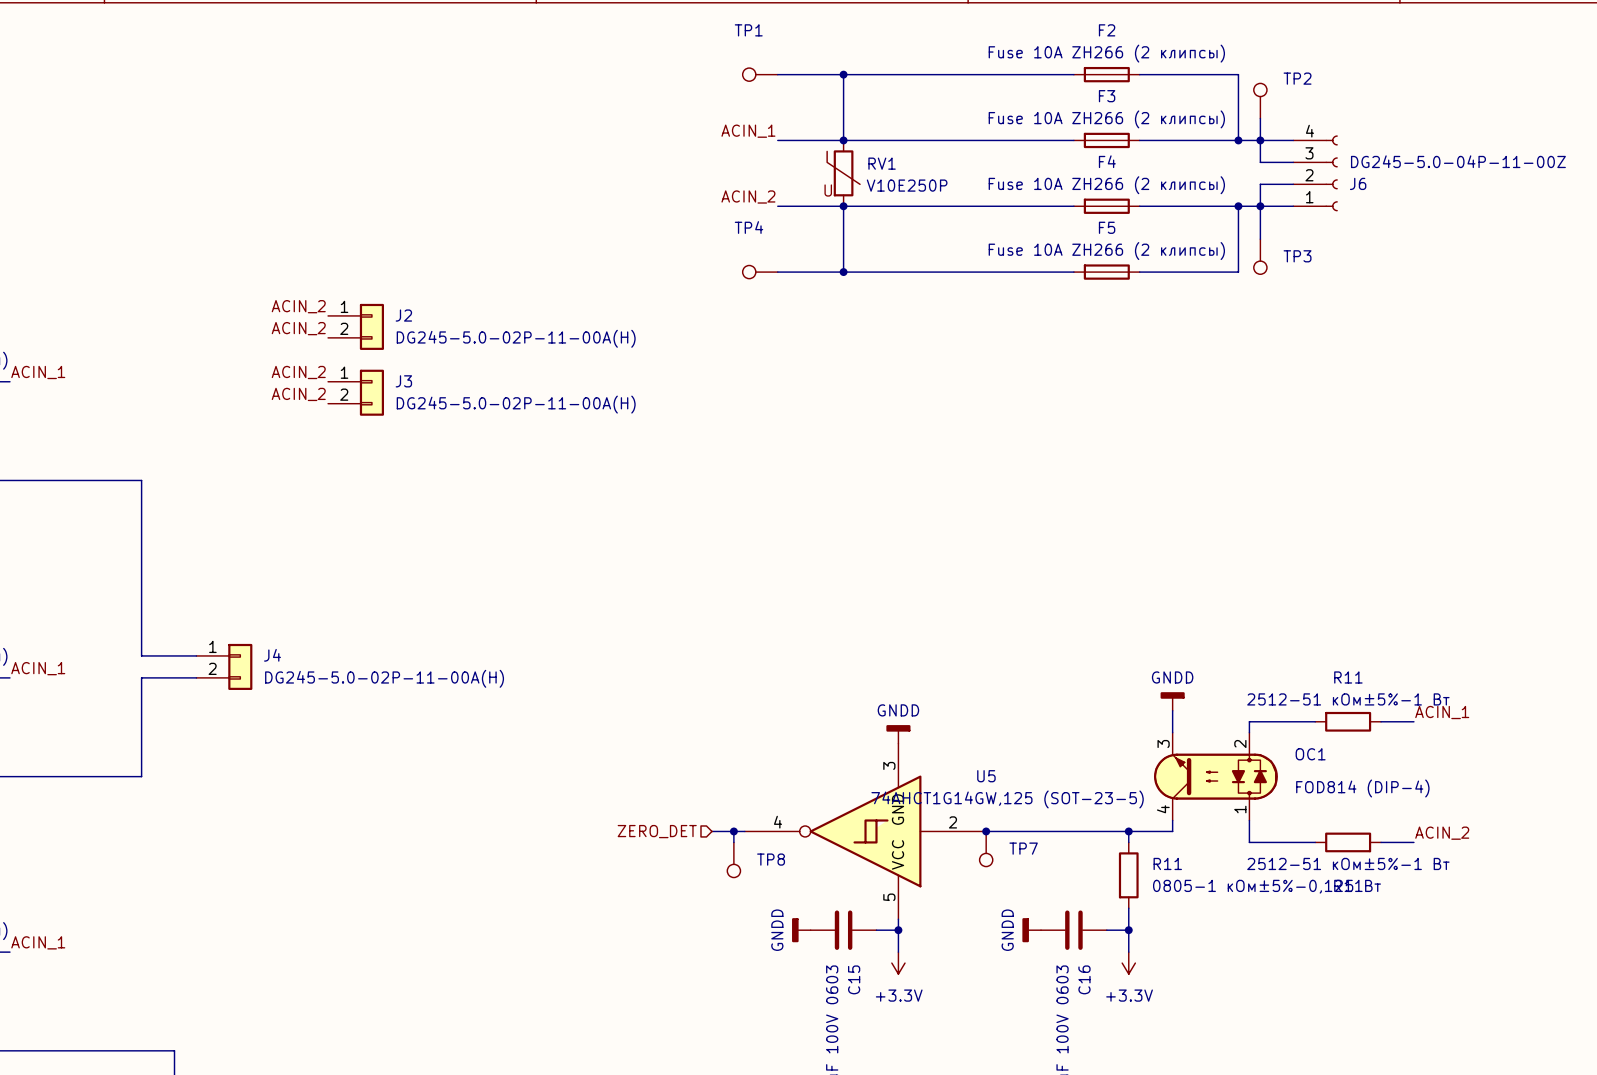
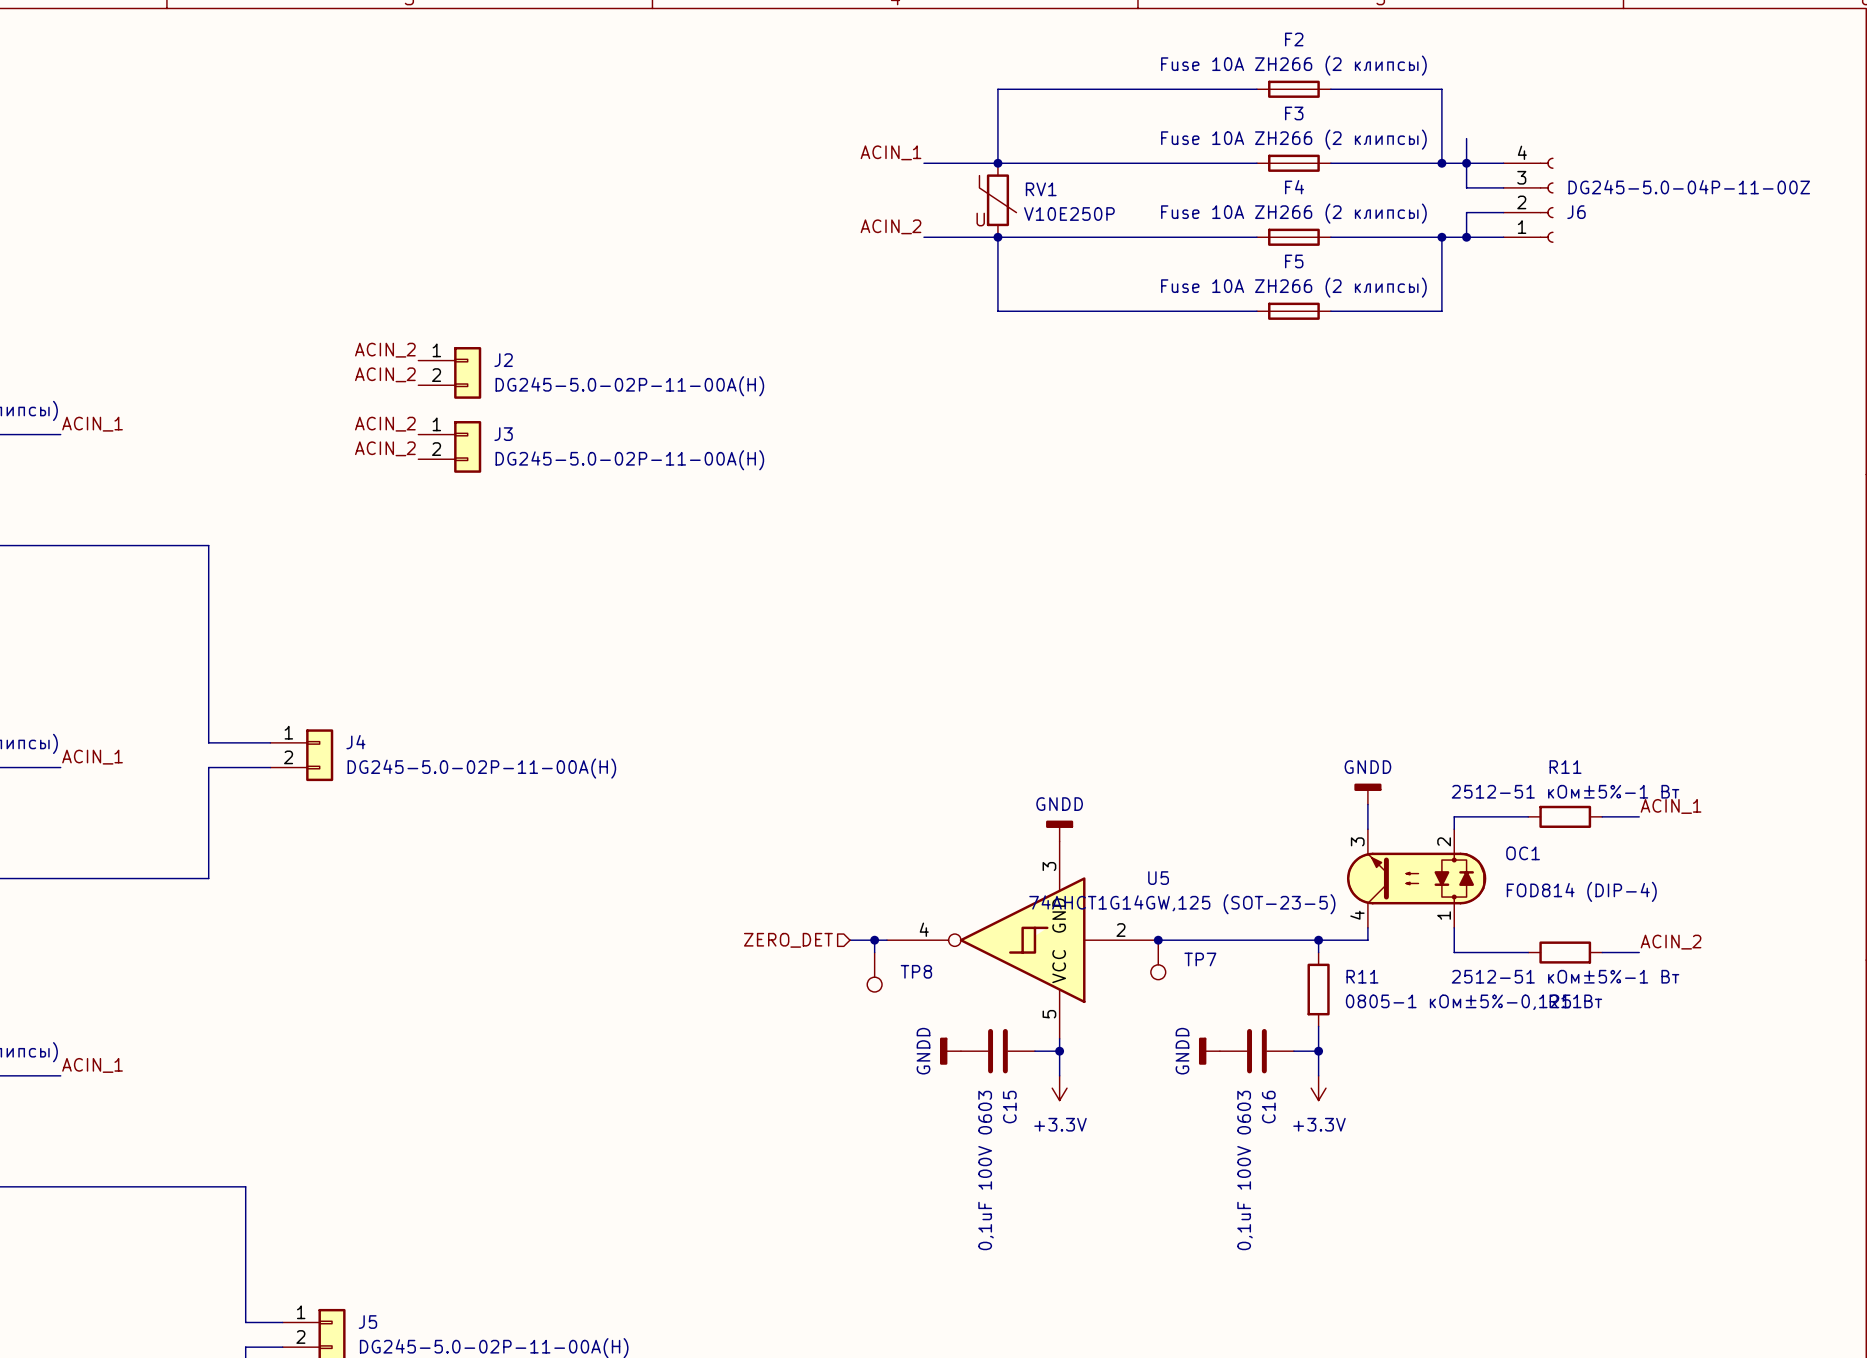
TP1: (760, 74) -> none
wire: (777, 74) (843, 74) -> none
junction: (843, 74) -> none
TP2: (1260, 100) -> none
wire: (1260, 206) (1260, 239) -> none
TP3: (1260, 256) -> none
TP4: (760, 272) -> none
wire: (777, 272) (843, 272) -> none
junction: (843, 272) -> none

